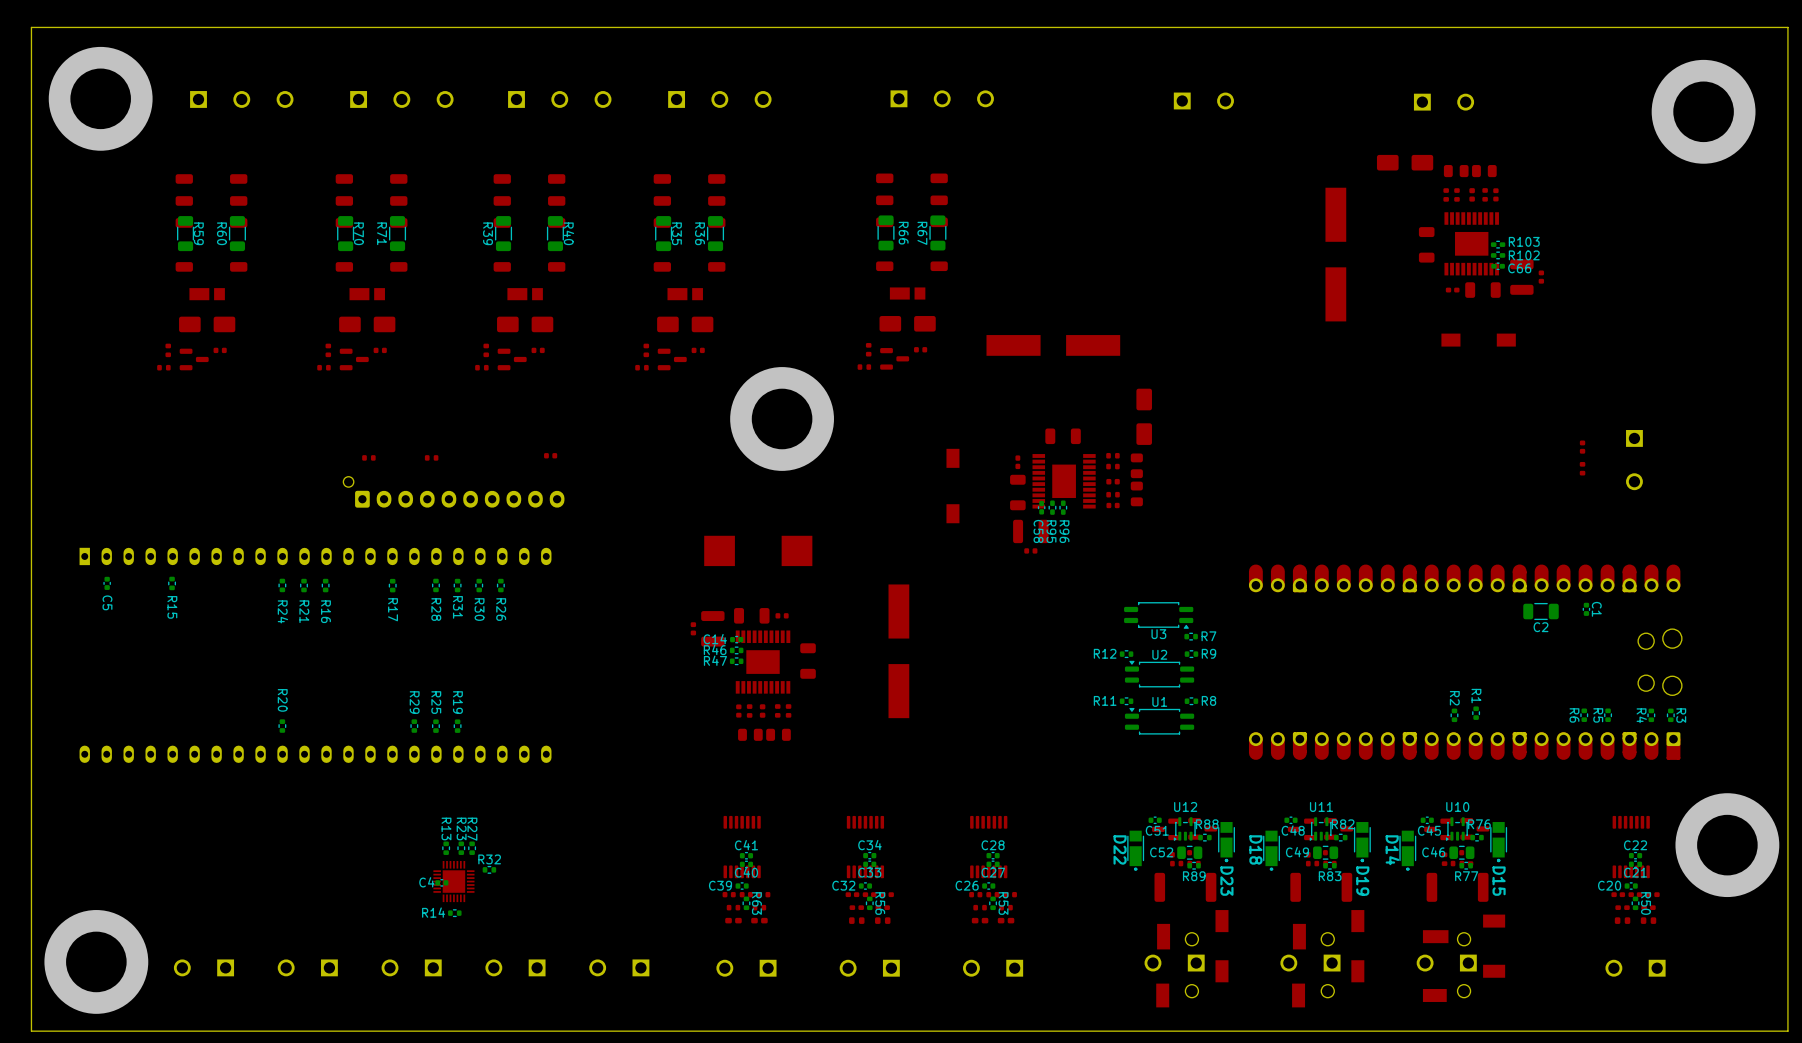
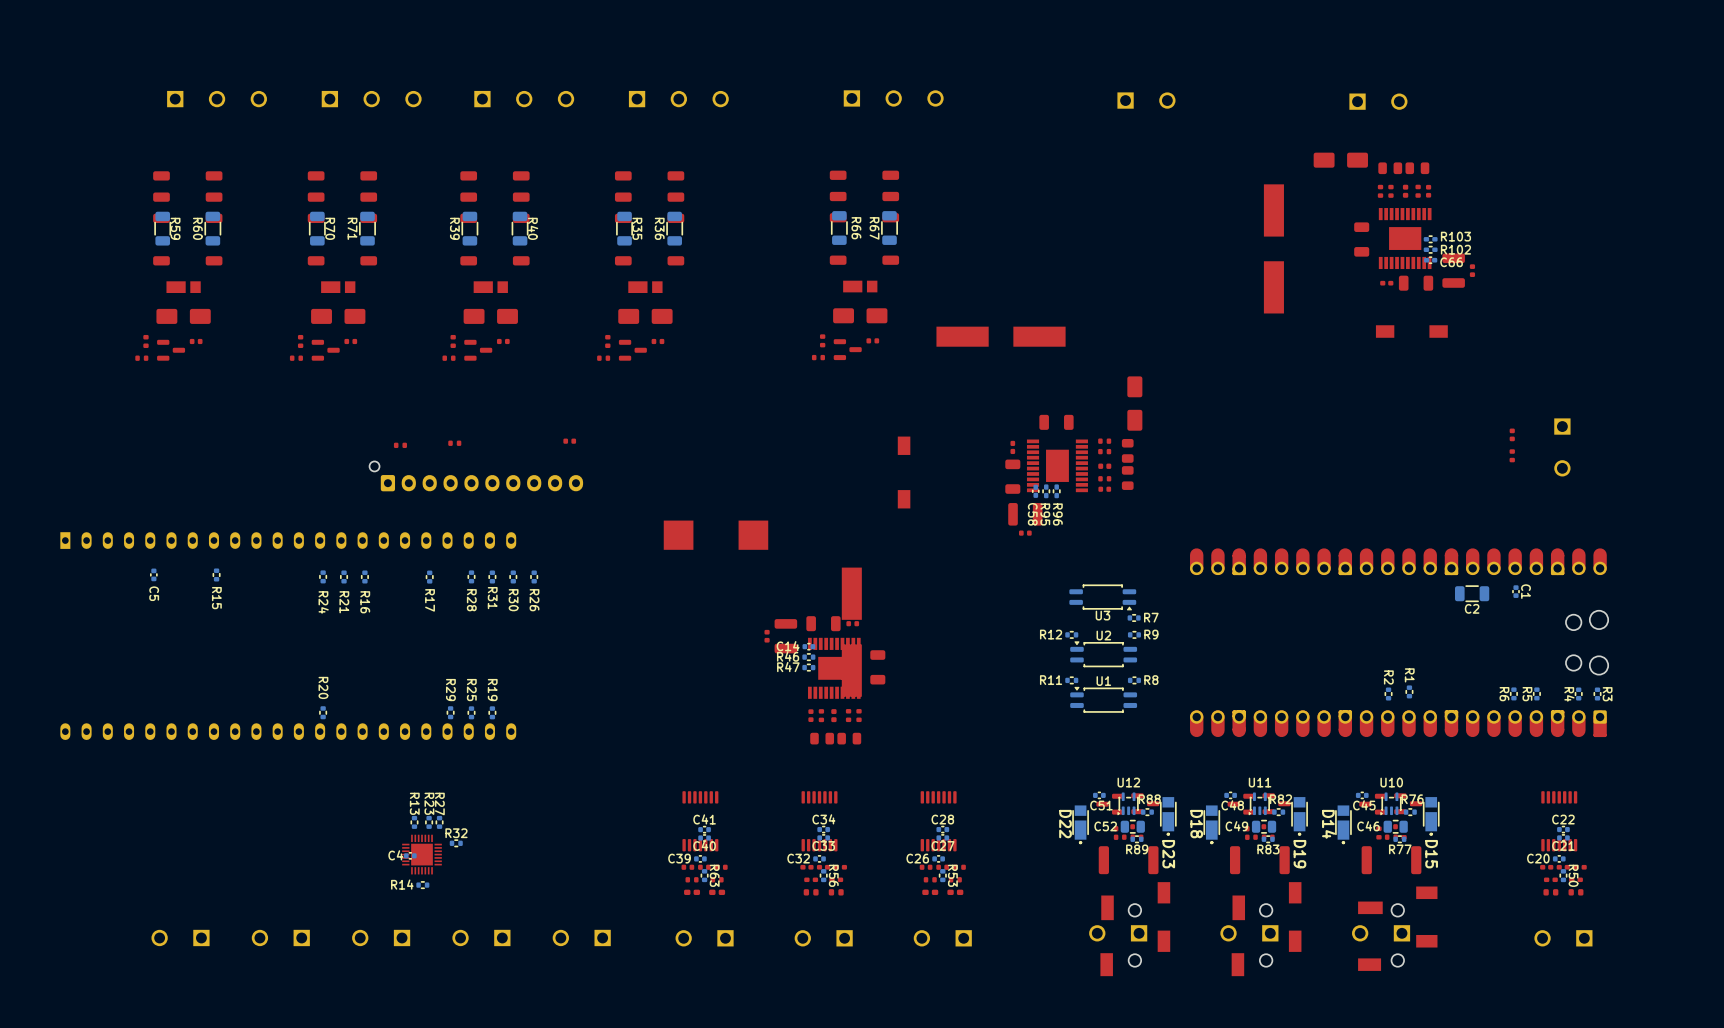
board edge: (1787, 27) (31, 27) (31, 1031) (1787, 1031) (1787, 27) -> none
via: (100, 98) -> none
via: (1703, 111) -> none
part position: (1144, 416) -> (1134, 403)
via: (782, 418) -> none
part: none -> (1056, 422)
part: (1063, 436) -> none
part: none -> (1104, 441)
part position: (550, 455) -> (569, 441)
part: (1112, 455) -> none
part position: (368, 457) -> (454, 443)
part position: (1017, 462) -> (1012, 447)
part: none -> (1127, 450)
part: none -> (1104, 451)
part: (1136, 465) -> none
part: (1112, 466) -> none
part footprint: [1106, 478, 1120, 485] -> [1026, 439, 1088, 493]
part: none -> (1104, 466)
part: (1064, 481) -> none
part: none -> (1012, 476)
part: none -> (1127, 478)
part position: (453, 492) -> (476, 476)
part: (1017, 492) -> none
part: none -> (1104, 478)
part: (1136, 493) -> none
part: (1113, 494) -> none
part: none -> (1104, 489)
part: (1113, 505) -> none
C58 position: (1041, 507) -> (1035, 491)
R95 position: (1052, 507) -> (1046, 491)
R96 position: (1063, 507) -> (1056, 491)
part position: (1030, 531) -> (1025, 514)
part: none -> (1025, 533)
part: (1030, 550) -> none
C5 position: (107, 583) -> (153, 574)
R15 position: (172, 583) -> (216, 574)
R24 position: (282, 585) -> (323, 576)
R21 position: (304, 585) -> (344, 576)
R16 position: (325, 585) -> (364, 576)
R17 position: (392, 585) -> (429, 577)
R28 position: (435, 585) -> (471, 576)
R31 position: (457, 585) -> (492, 576)
R30 position: (479, 585) -> (513, 576)
R26 position: (500, 585) -> (534, 576)
part: (751, 615) -> none
part: (782, 615) -> none
part: (693, 628) -> none
part: (712, 628) -> none
C14 position: (736, 639) -> (808, 646)
part: none -> (823, 623)
part: none -> (852, 623)
part footprint: [800, 643, 816, 679] -> [764, 629, 770, 643]
R46 position: (736, 650) -> (808, 657)
part: none -> (785, 636)
R47 position: (736, 661) -> (808, 667)
part position: (763, 662) -> (834, 668)
part: none -> (877, 667)
part: (777, 710) -> none
part: (788, 710) -> none
part: (738, 711) -> none
part: (749, 711) -> none
part position: (762, 711) -> (833, 715)
R20 position: (282, 726) -> (323, 712)
R29 position: (414, 726) -> (450, 712)
R25 position: (435, 726) -> (471, 712)
R19 position: (457, 726) -> (492, 712)
part: (750, 734) -> none
part: (778, 734) -> none
part: none -> (810, 715)
part: none -> (821, 715)
part: none -> (848, 715)
part: none -> (859, 715)
part: none -> (822, 738)
part: none -> (849, 738)
via: (1727, 845) -> none
via: (96, 961) -> none

